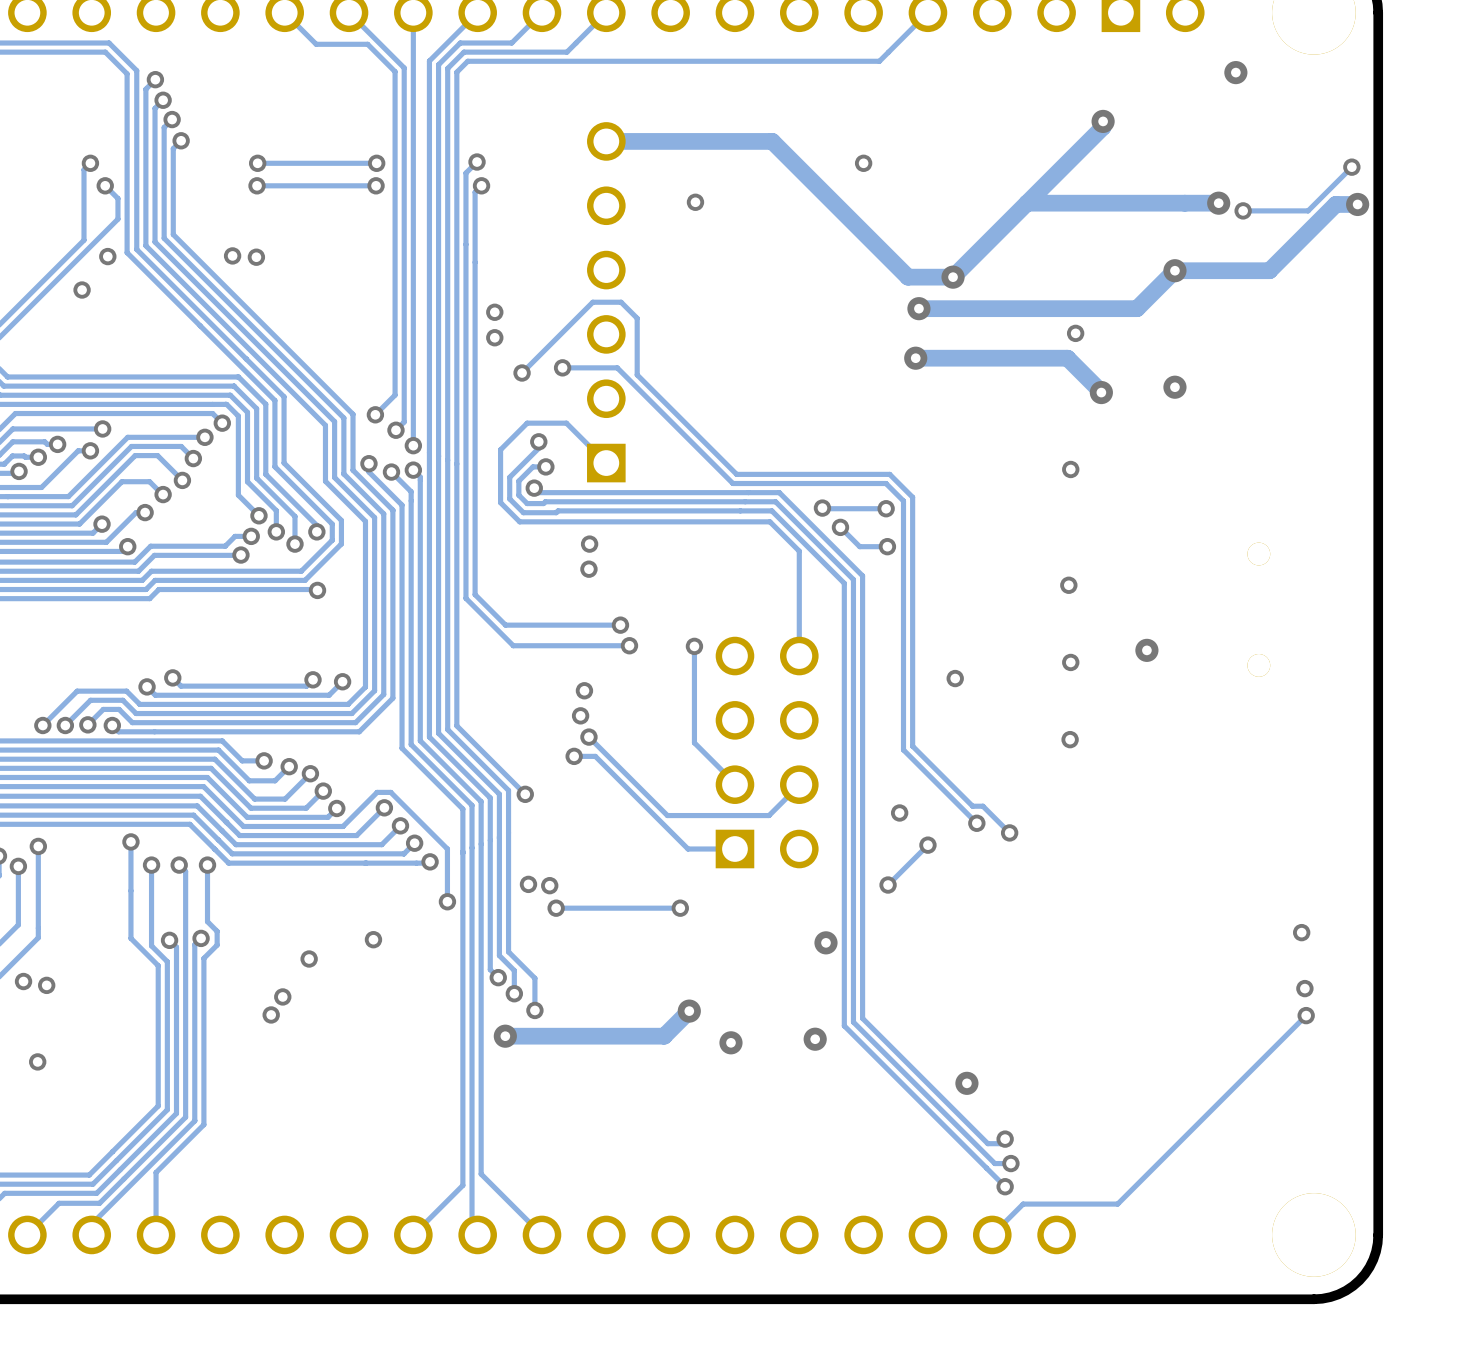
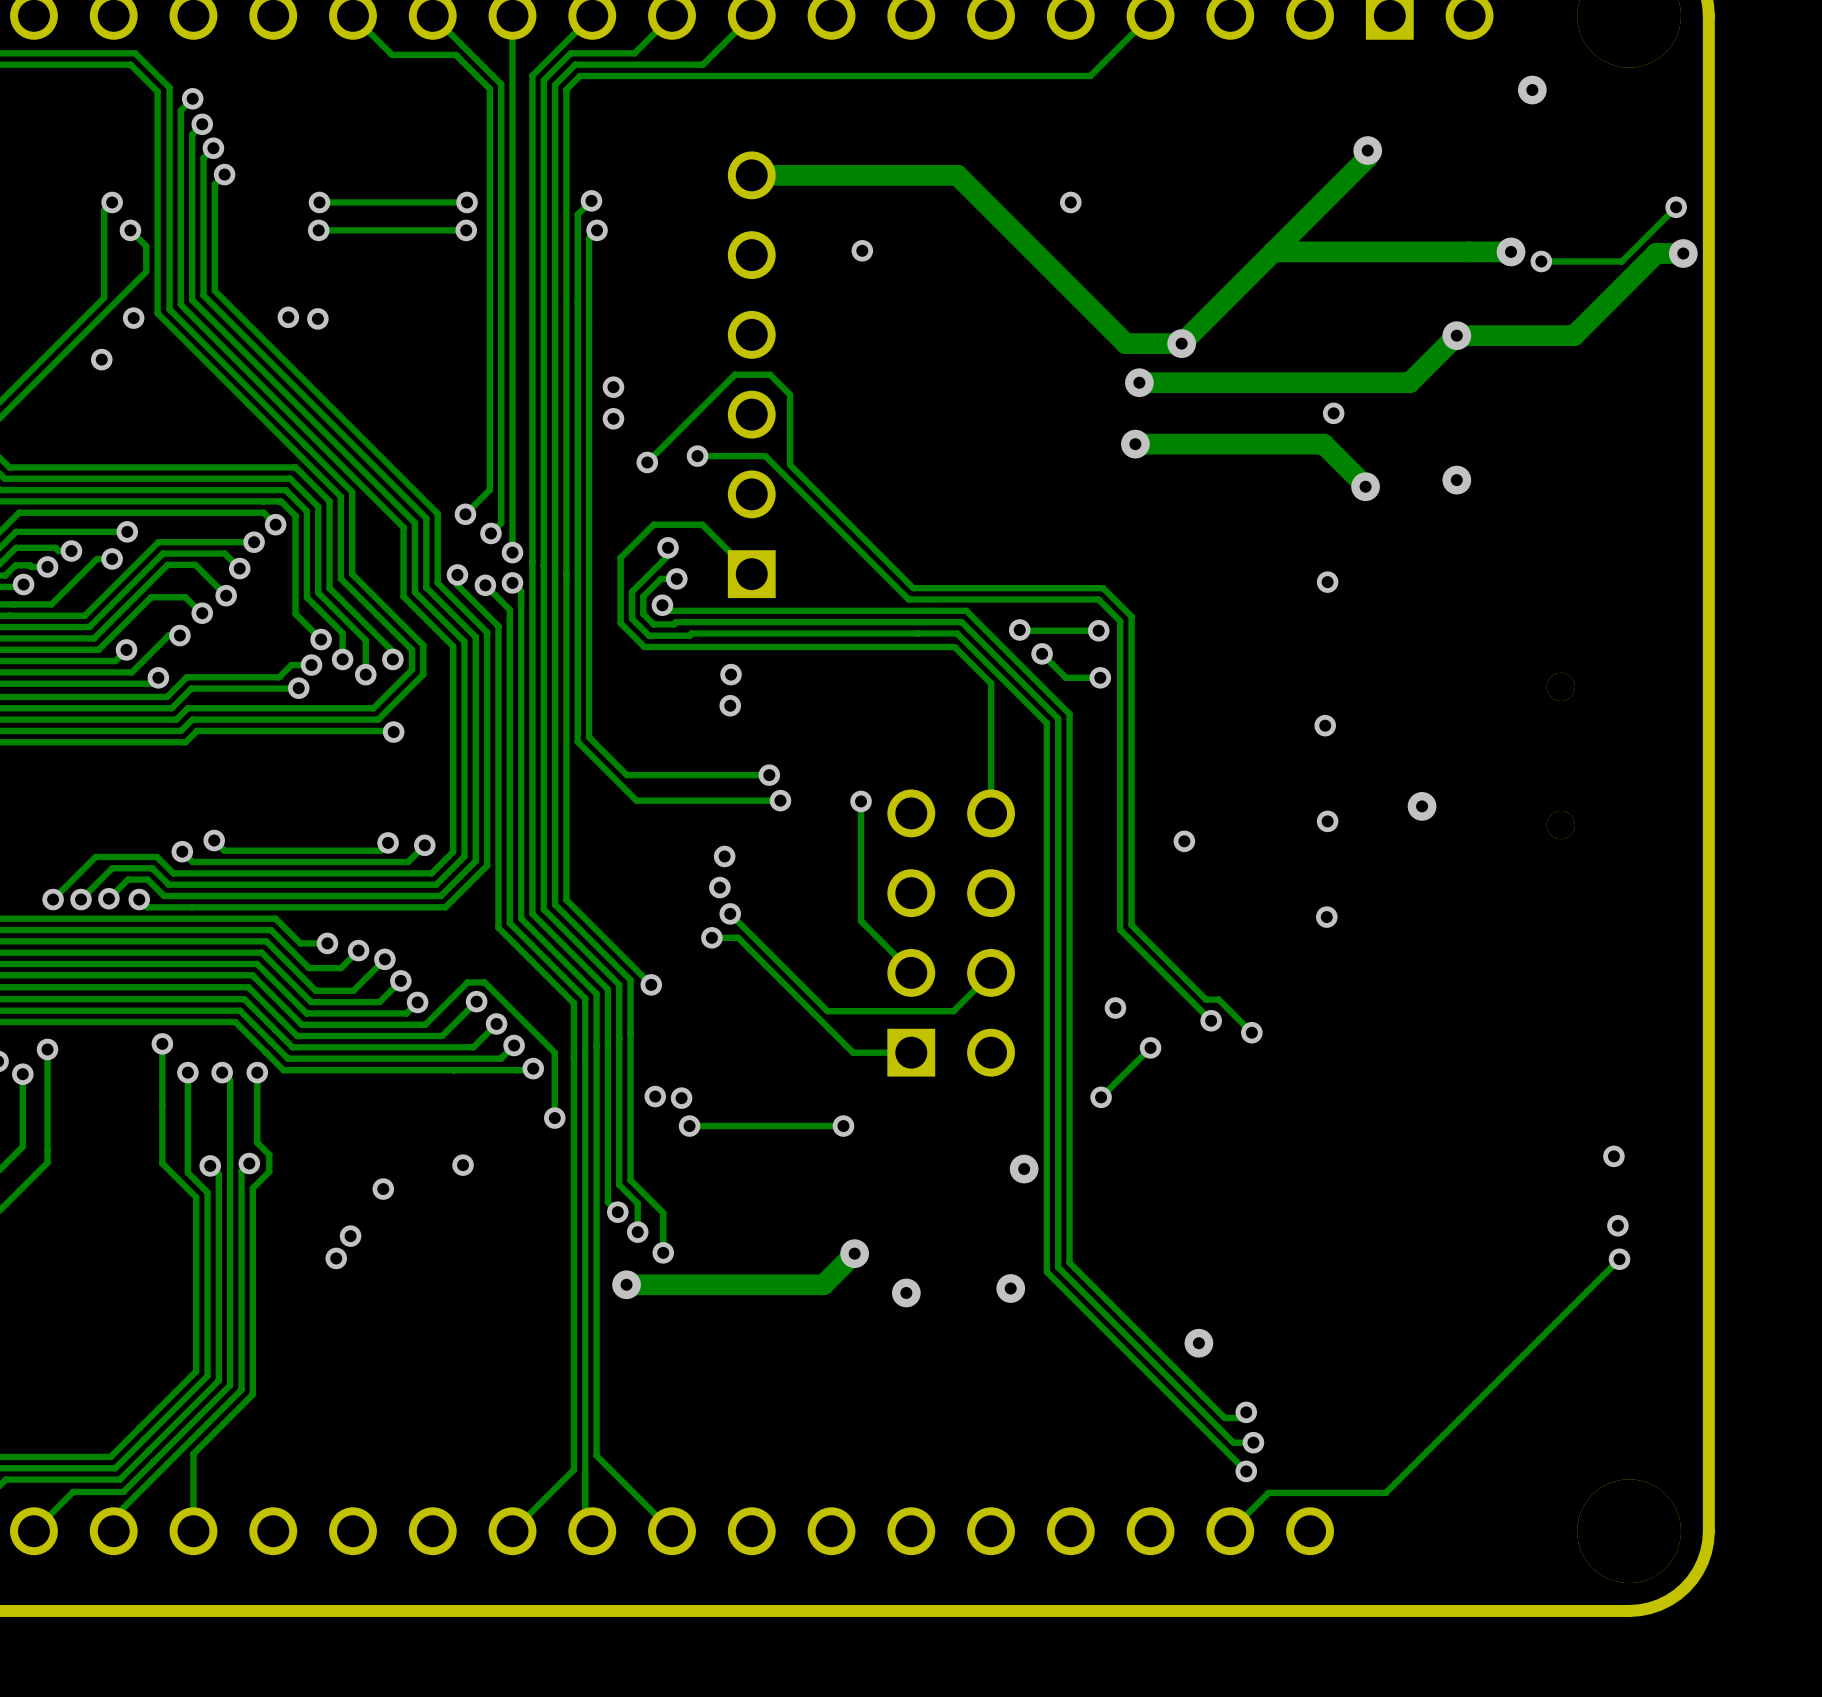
via: (23, 981) -> none
via: (46, 985) -> none
via: (37, 1061) -> none

